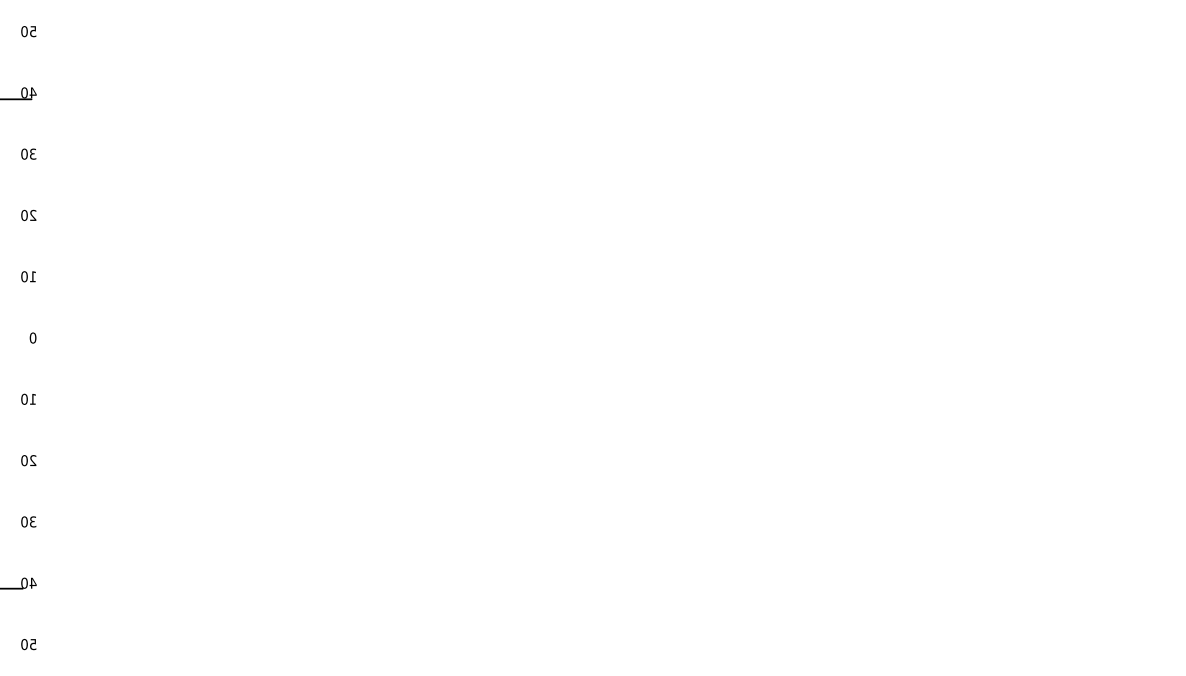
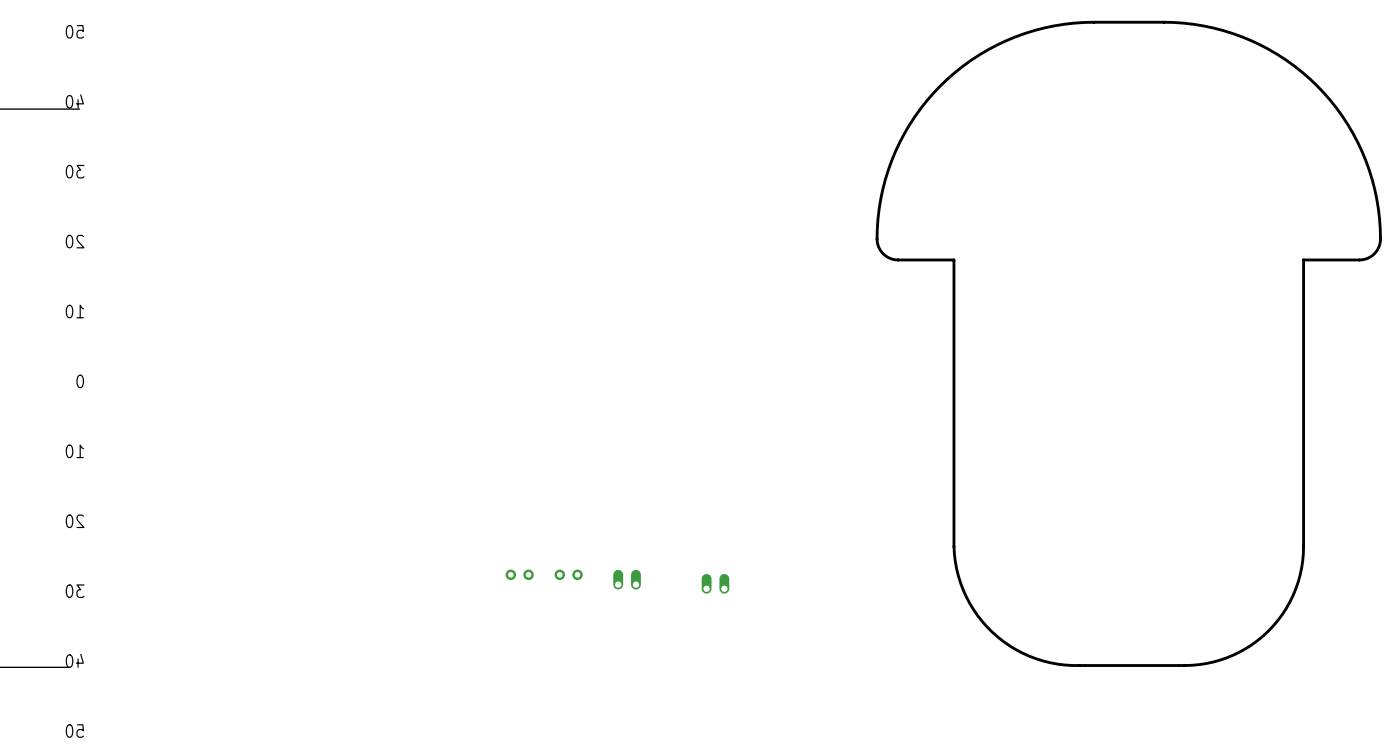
board edge: none -> (1163, 22) (1083, 22) (1053, 25) (1015, 36) (979, 54) (940, 85) (914, 116) (895, 151) (880, 199) (877, 241) (879, 249) (885, 255) (898, 259) (953, 259) (953, 546) (956, 568) (963, 589) (982, 621) (1003, 641) (1029, 656) (1057, 664) (1184, 665) (1206, 663) (1226, 657) (1246, 648) (1263, 635) (1278, 619) (1295, 588) (1303, 553) (1303, 259) (1364, 259) (1374, 253) (1380, 241) (1376, 199) (1365, 160) (1348, 124) (1317, 85) (1286, 60) (1251, 40) (1203, 25) (1163, 22)
part: none -> (519, 574)
part: none -> (568, 574)
part: none -> (627, 579)
part: none -> (715, 583)

